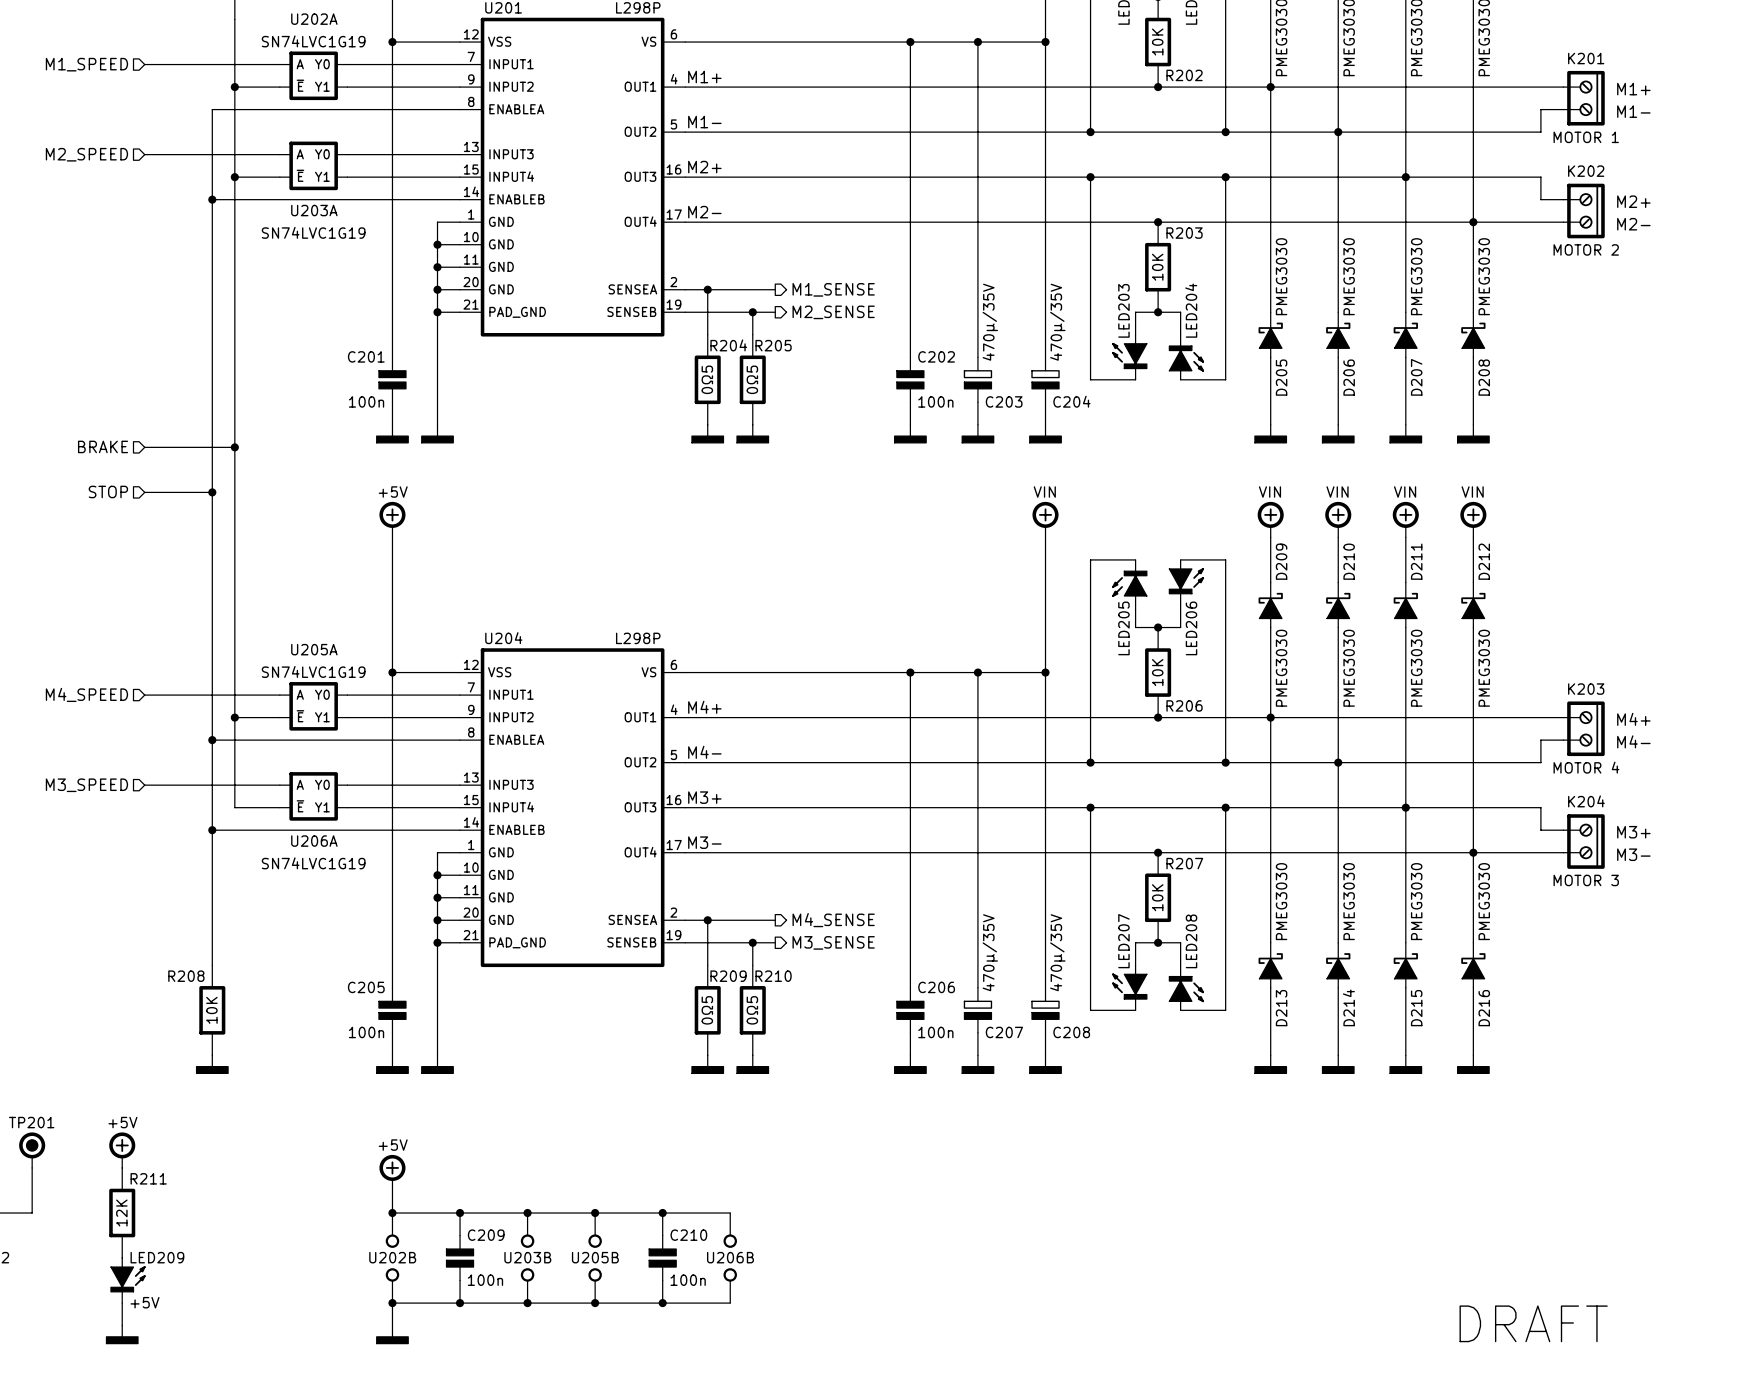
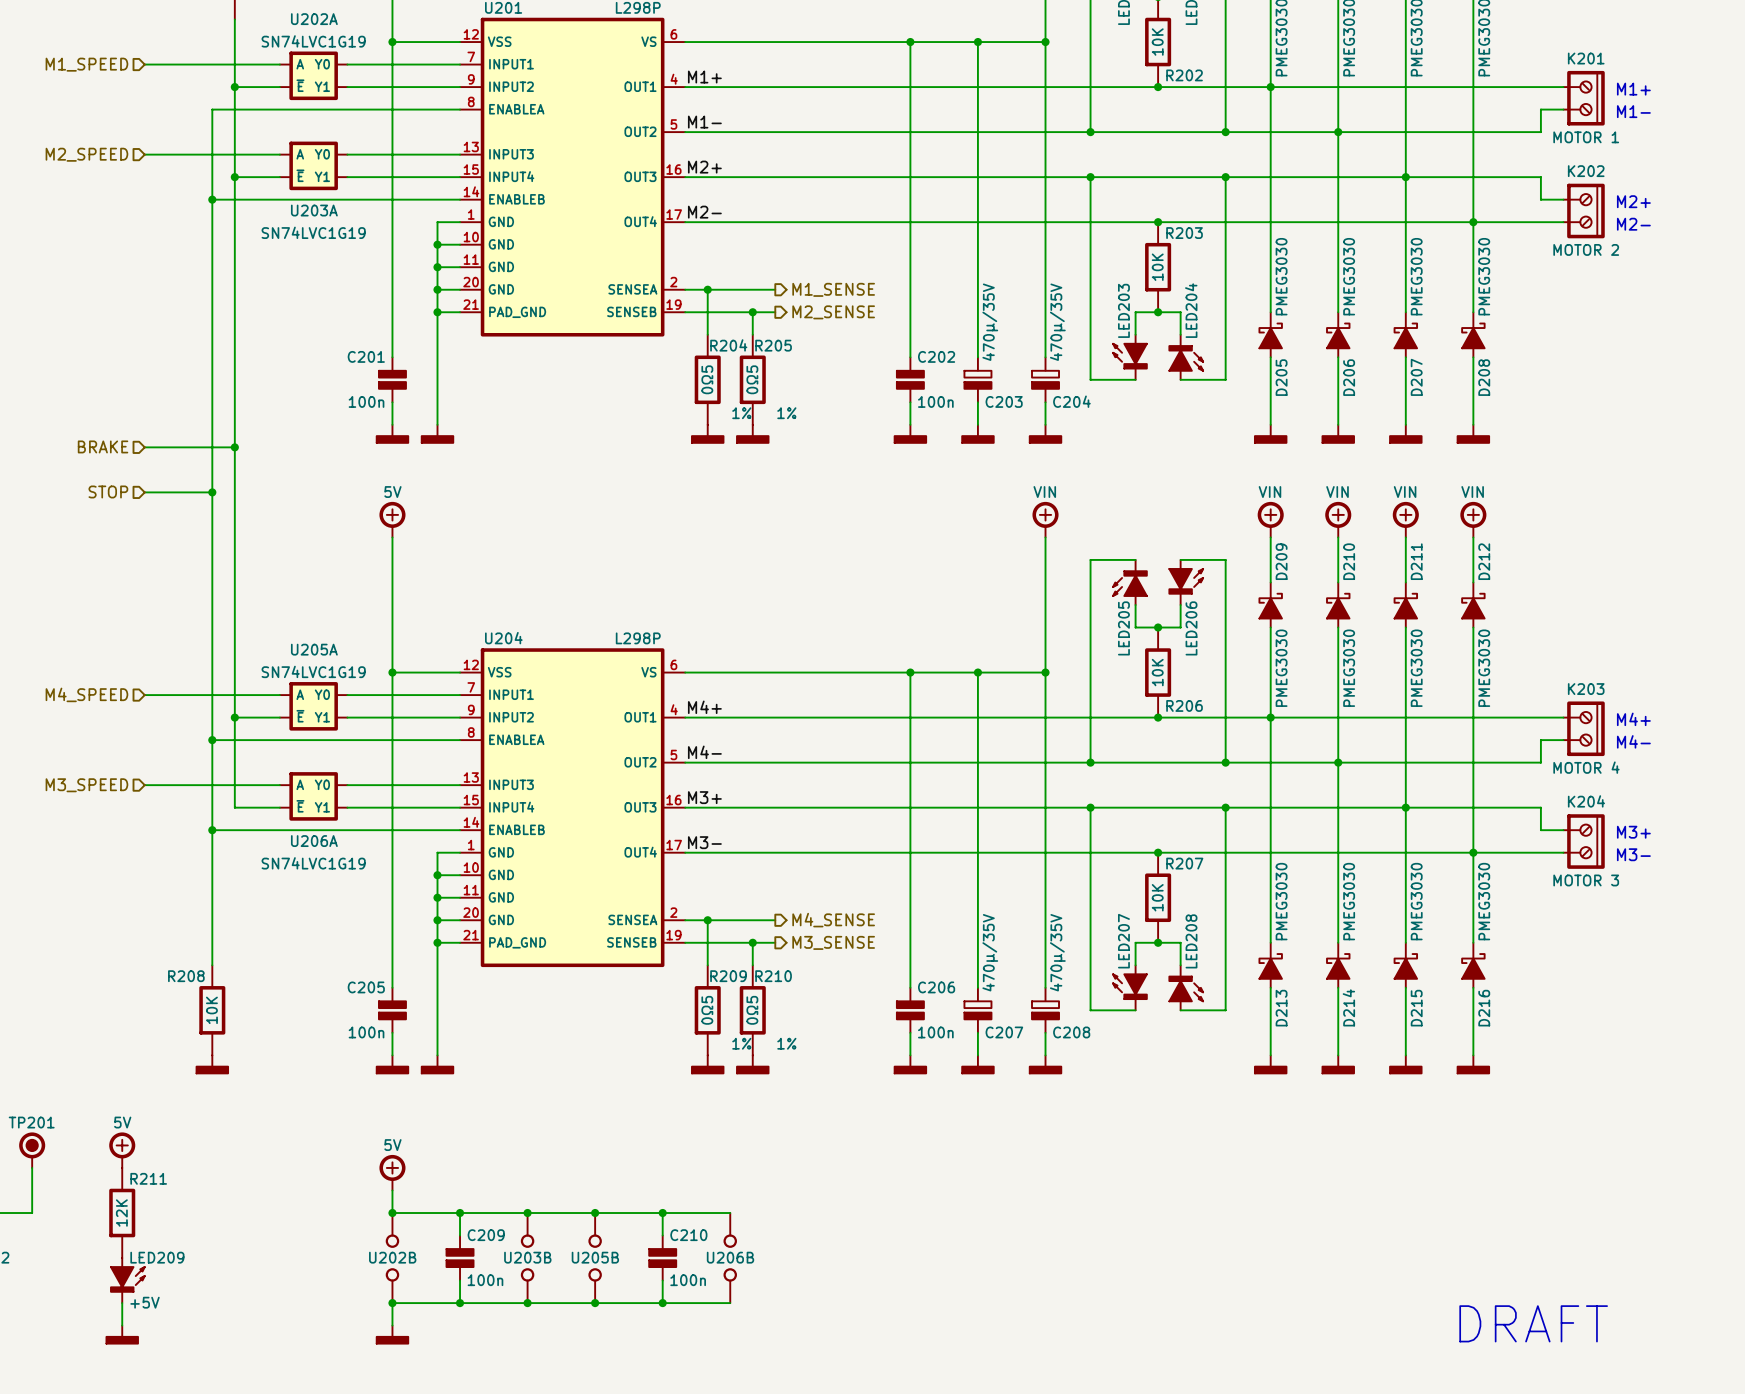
R204 text: none -> 1% (741, 413)
R205 text: none -> 1% (786, 413)
power symbol text: +5V (393, 492) -> 5V (392, 492)
R209 text: none -> 1% (741, 1043)
R210 text: none -> 1% (786, 1043)
power symbol text: +5V (122, 1122) -> 5V (122, 1122)
power symbol text: +5V (393, 1145) -> 5V (392, 1145)

